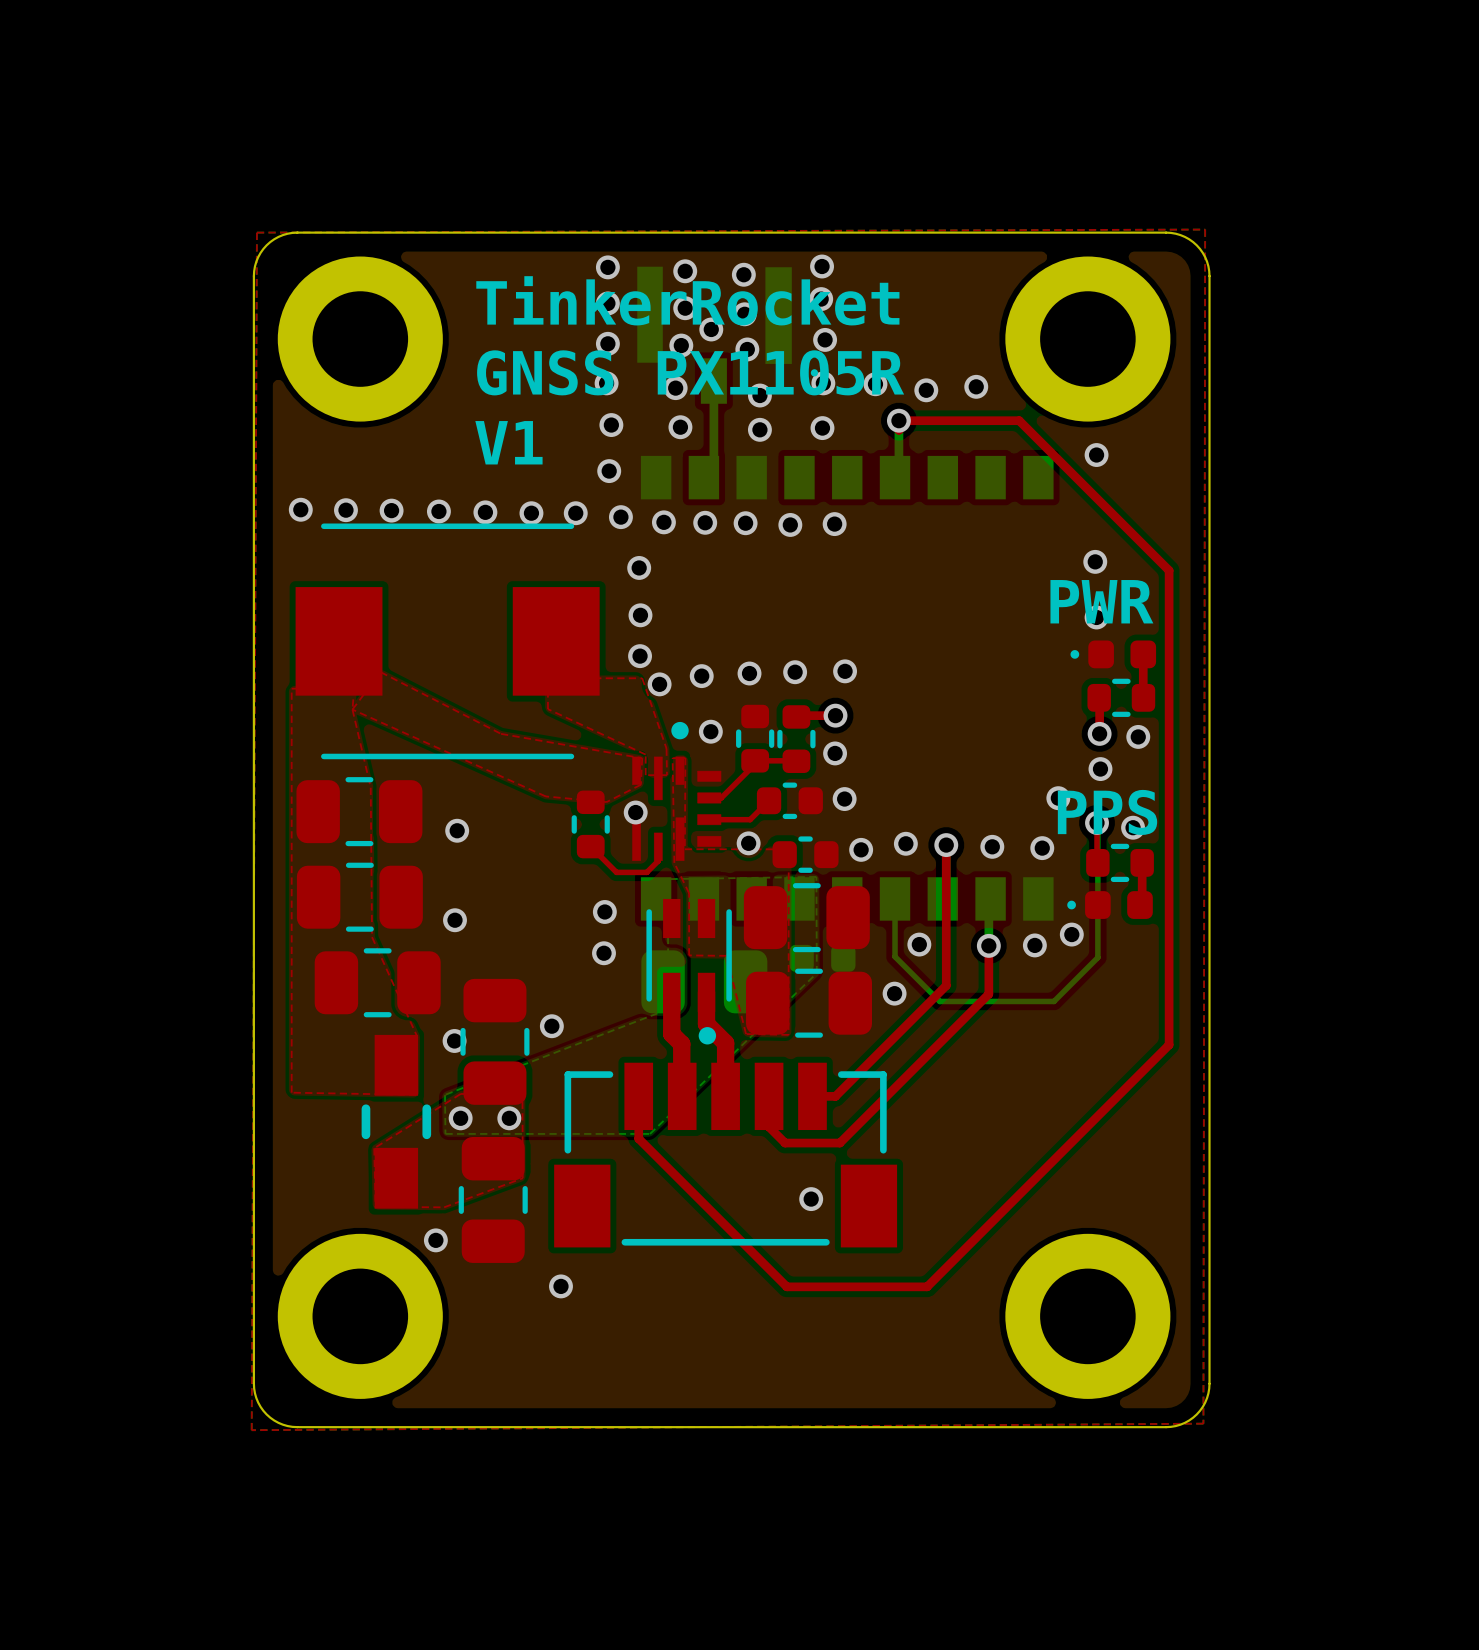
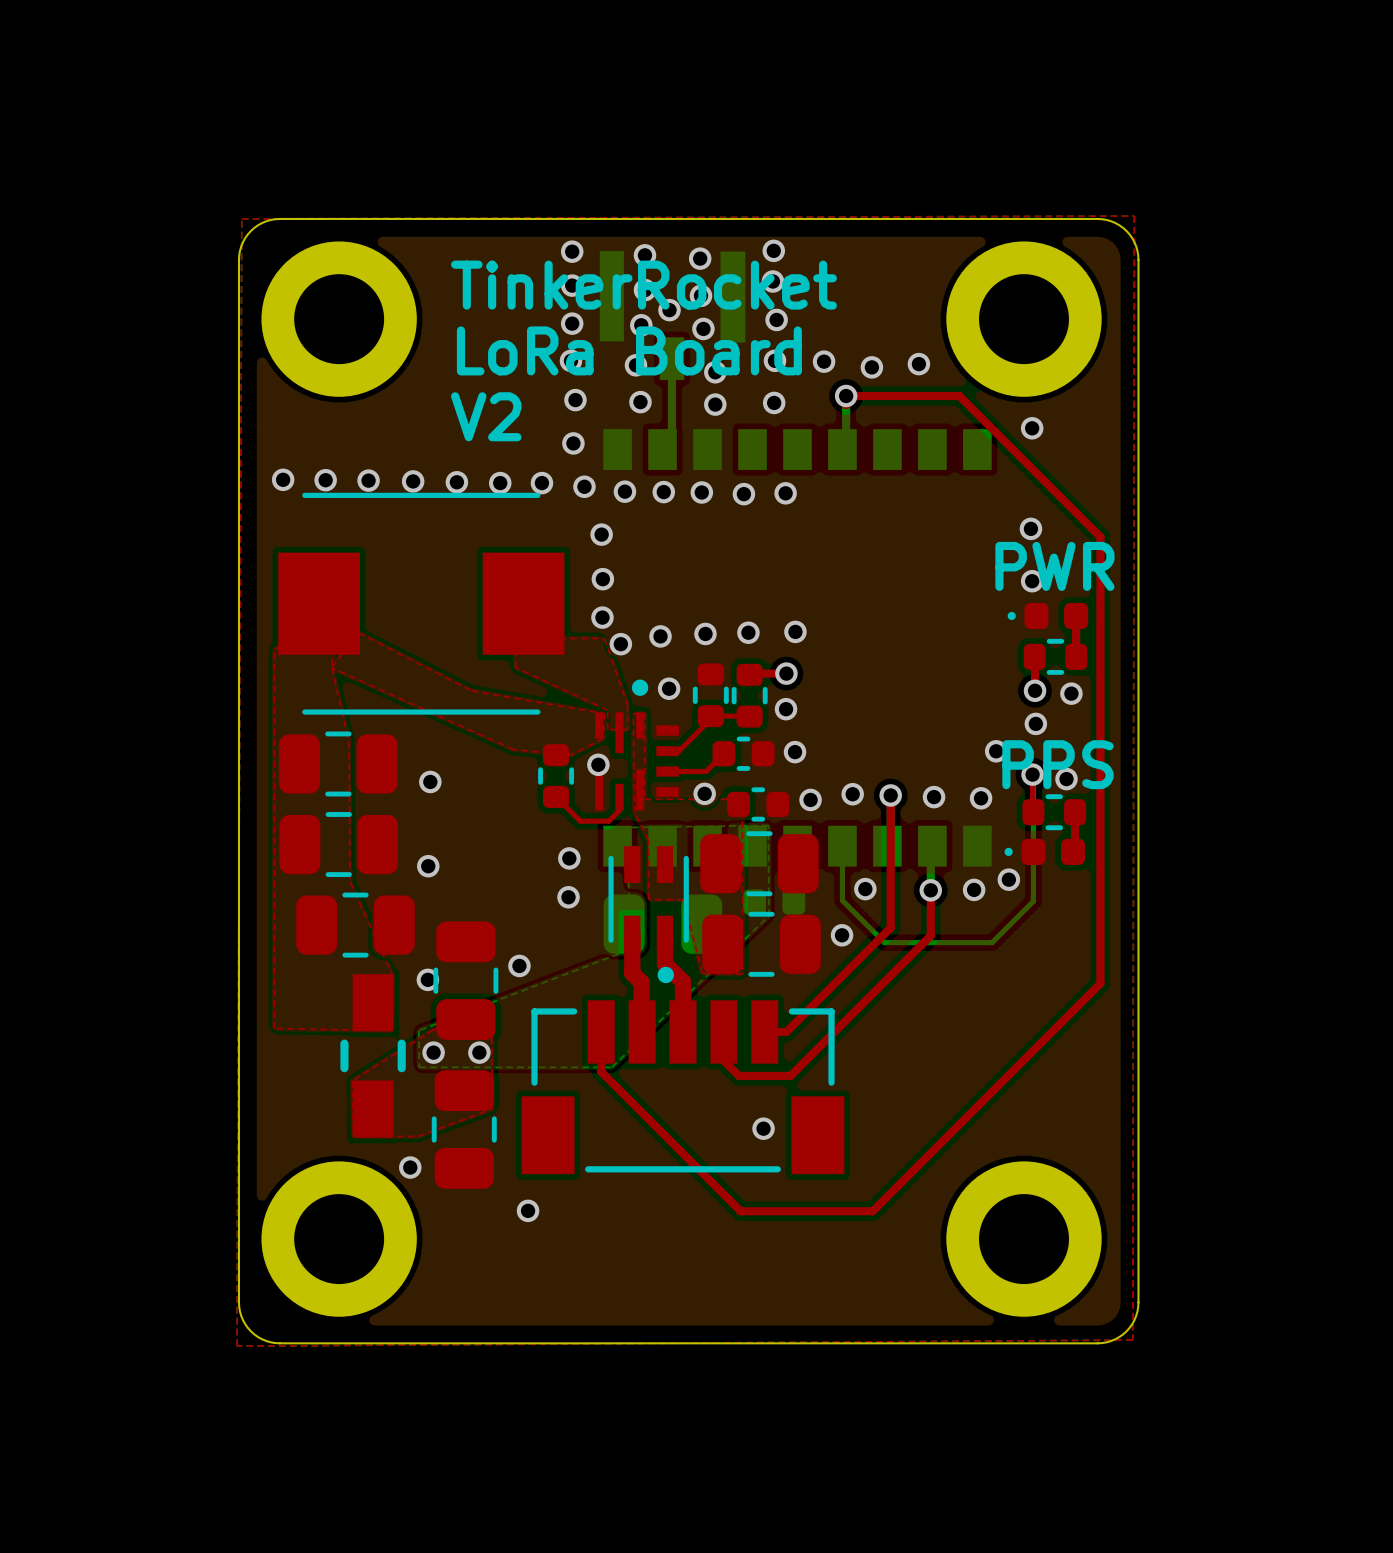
text: GNSS PX1105R (690, 372) -> LoRa Board (629, 350)
text: V1 (508, 442) -> V2 (486, 416)

